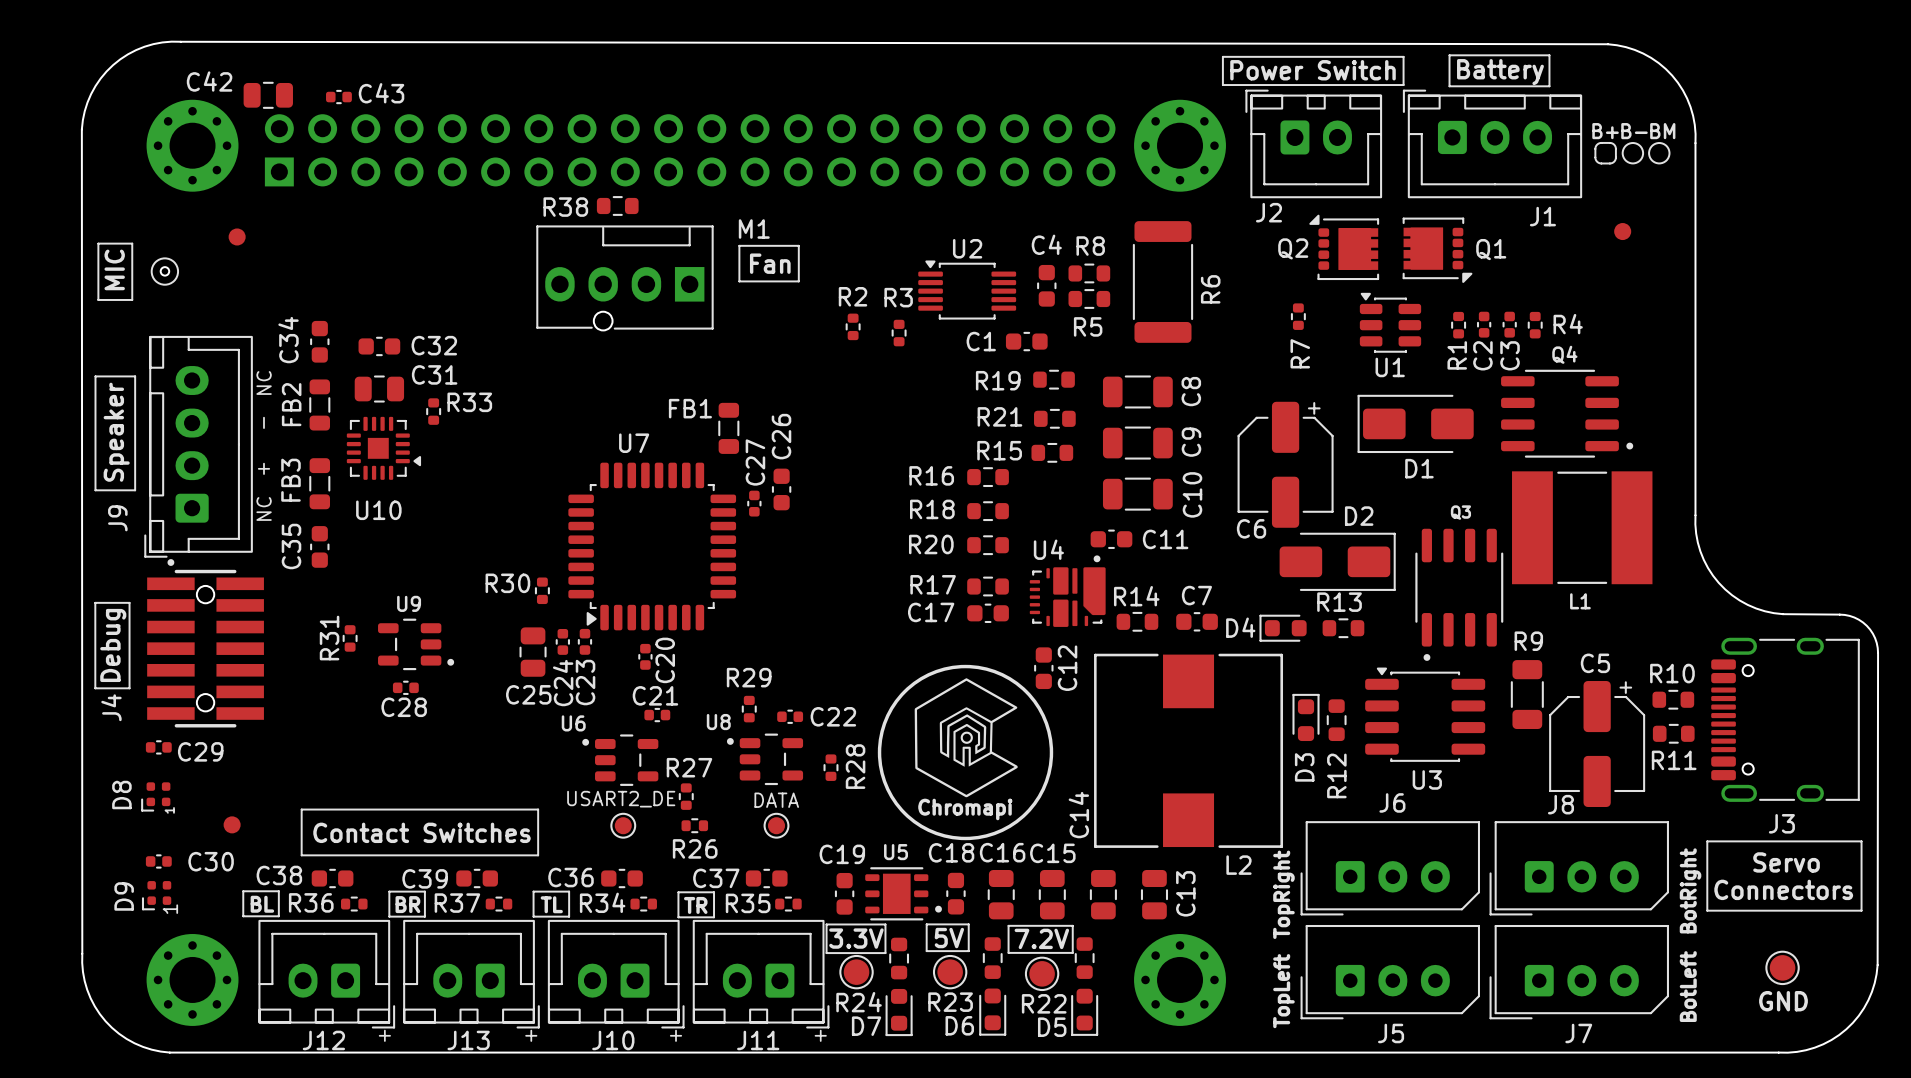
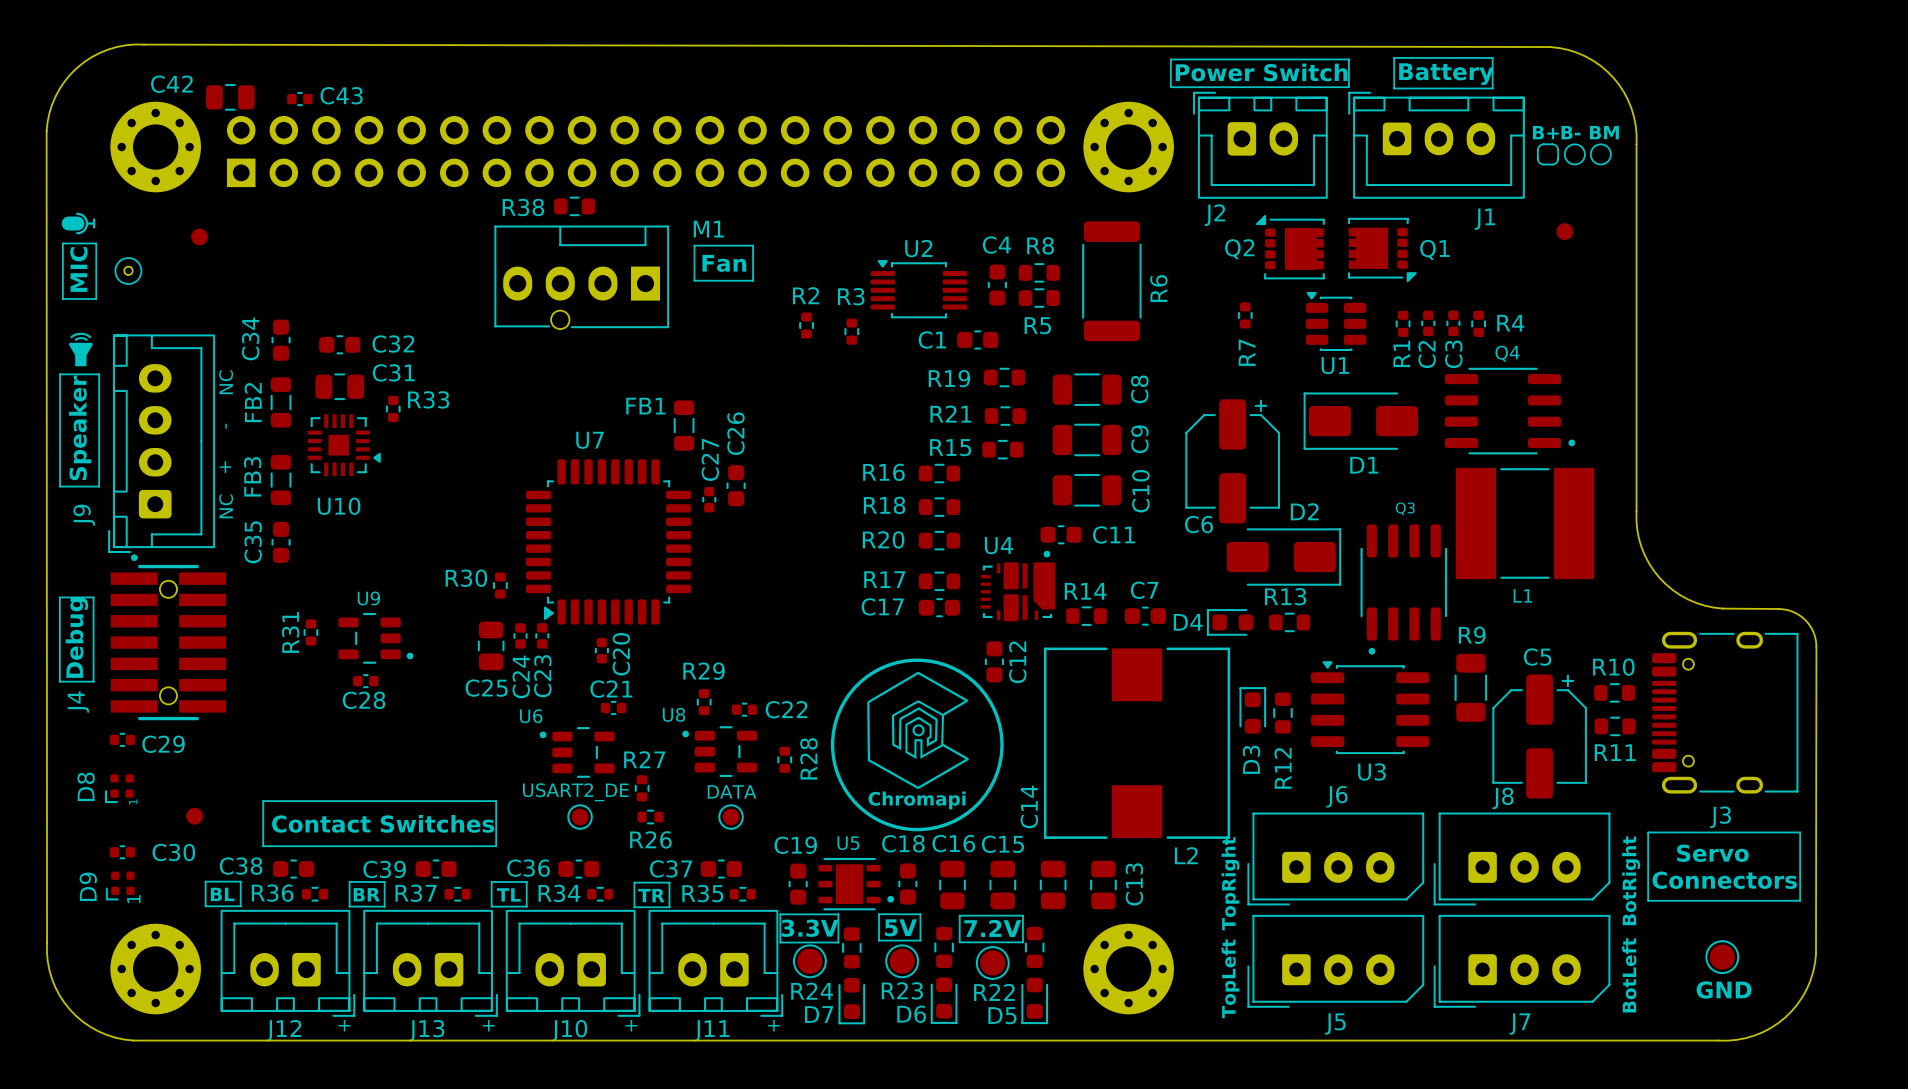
drawing: none -> [61, 212, 96, 235]
drawing: none -> [69, 332, 93, 367]

